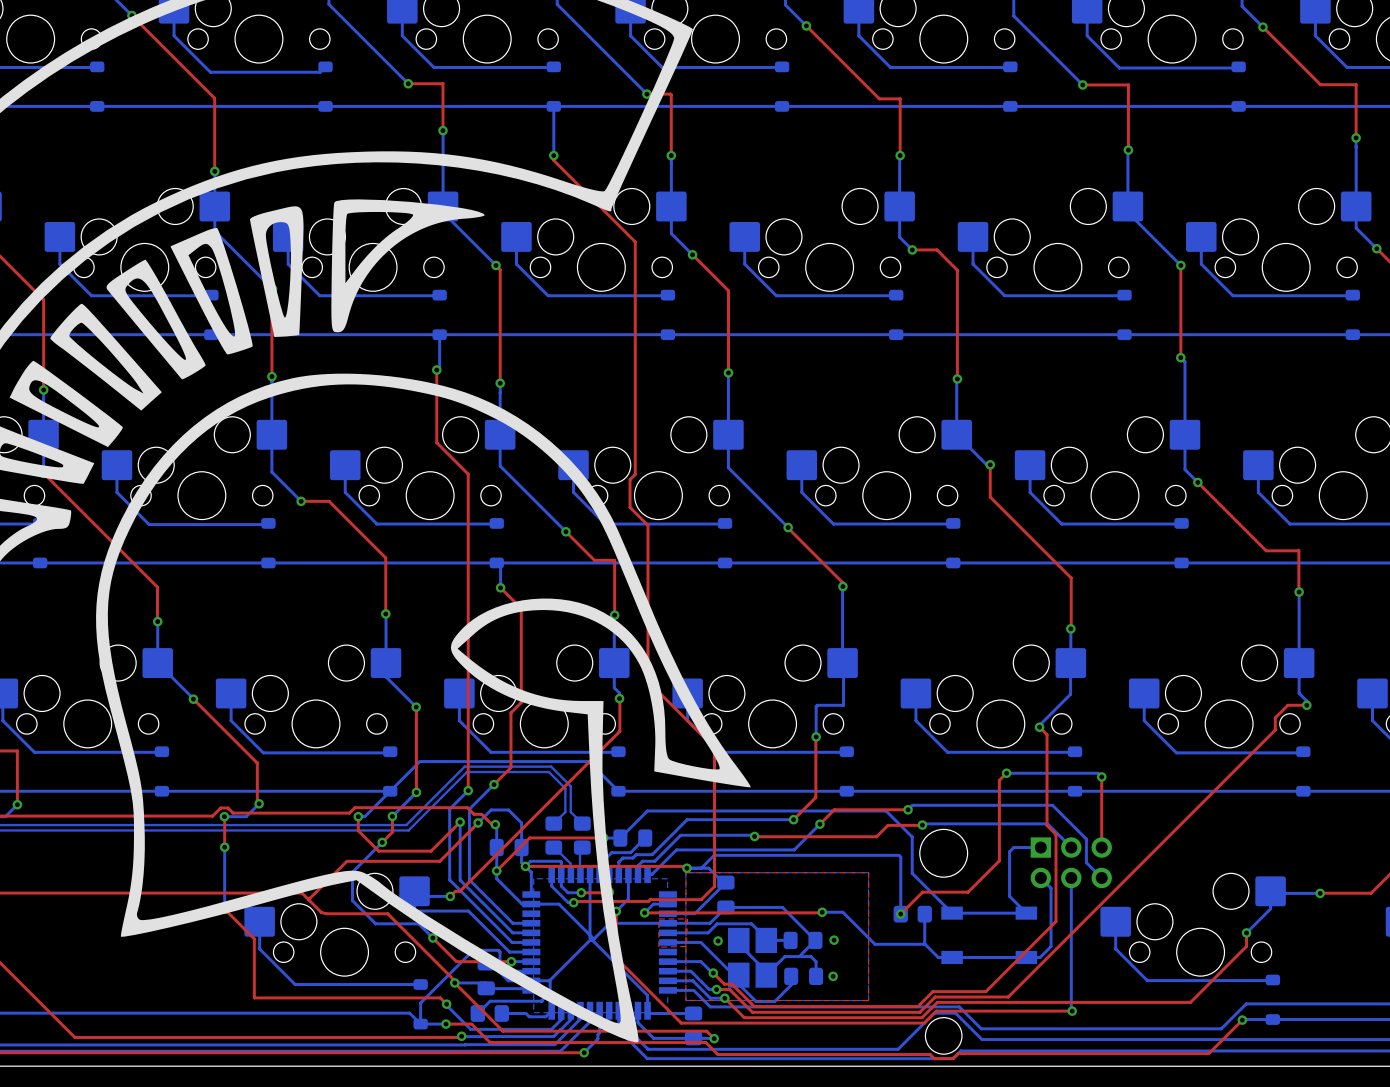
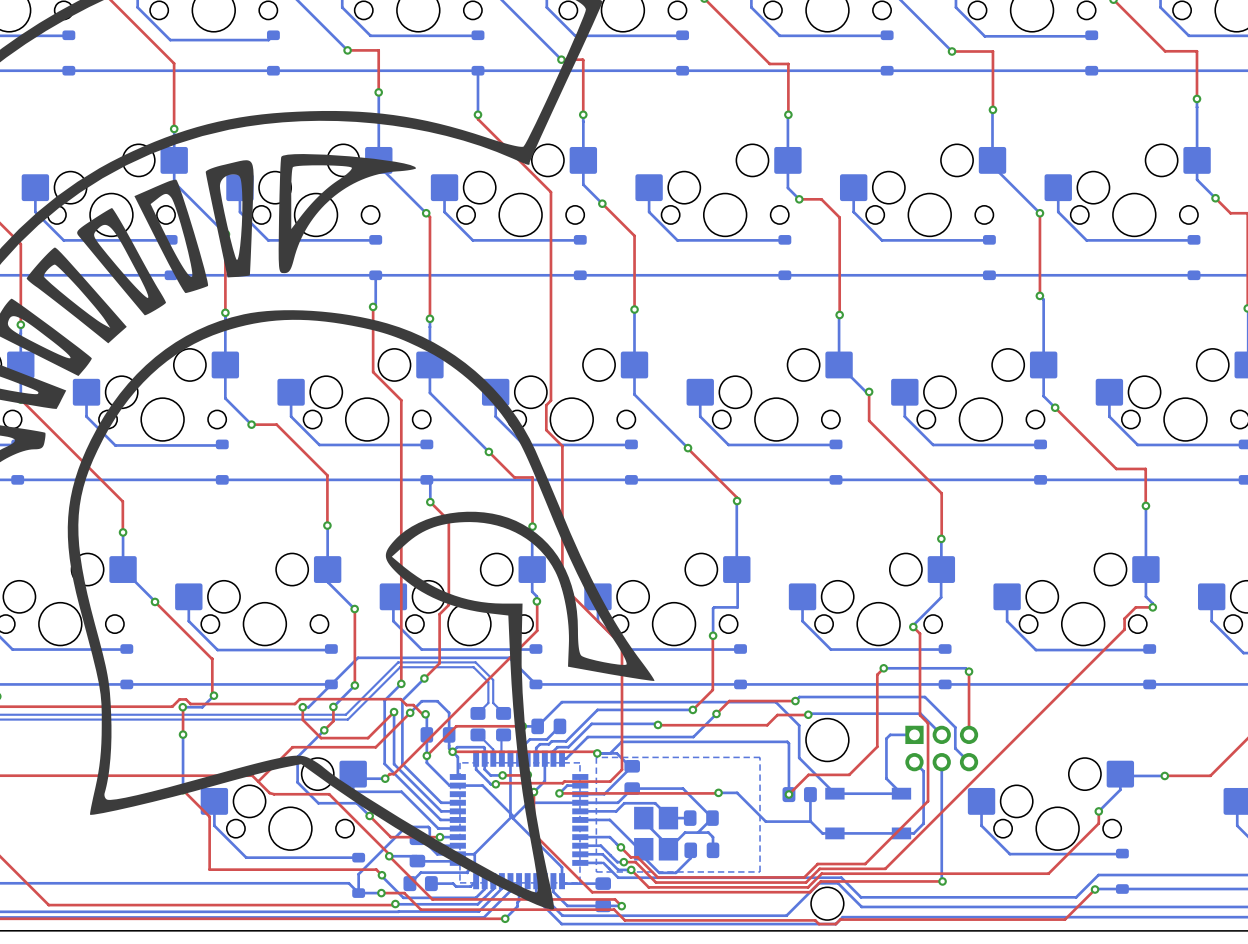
top zone outline: (868, 872) (868, 1000) (685, 1000) (685, 872) (868, 872) -> none
top zone outline: (658, 918) (658, 947) (686, 946) (687, 918) (658, 918) -> none
via: (834, 940) -> none
via: (718, 941) -> none
via: (833, 976) -> none

